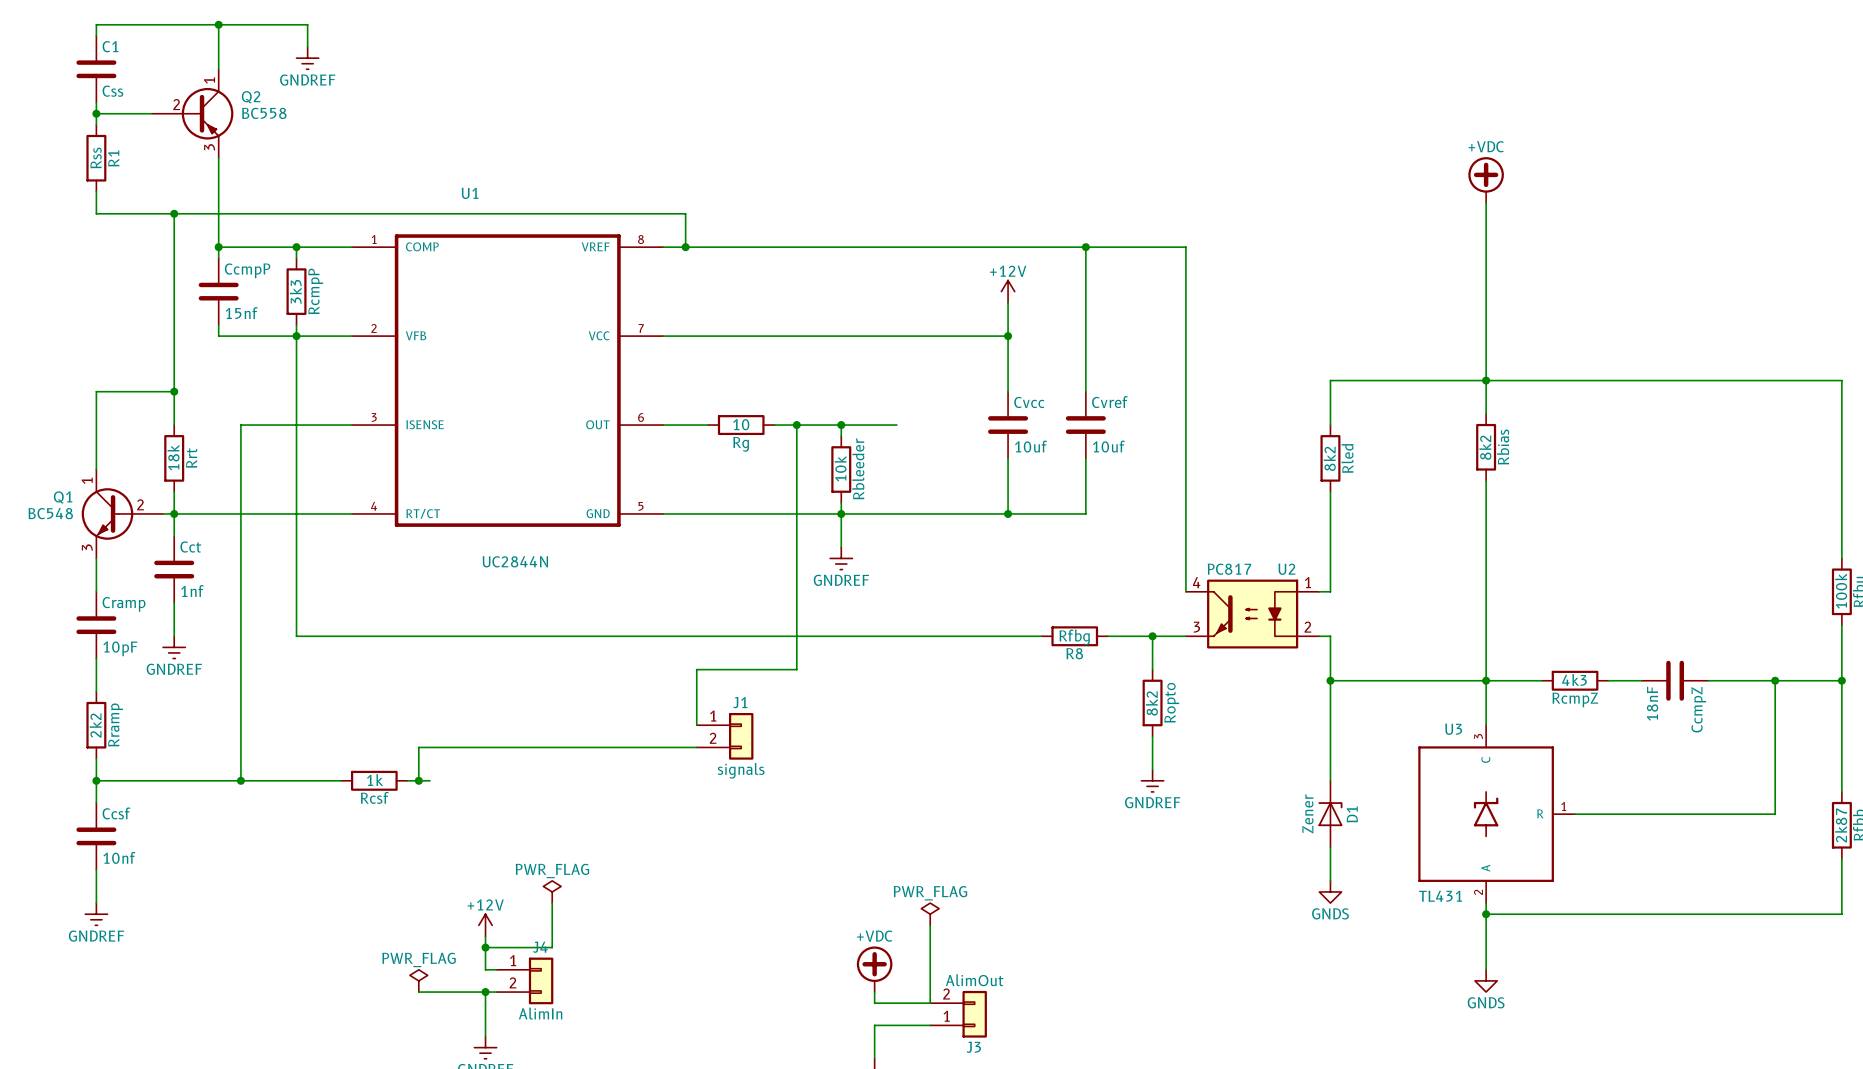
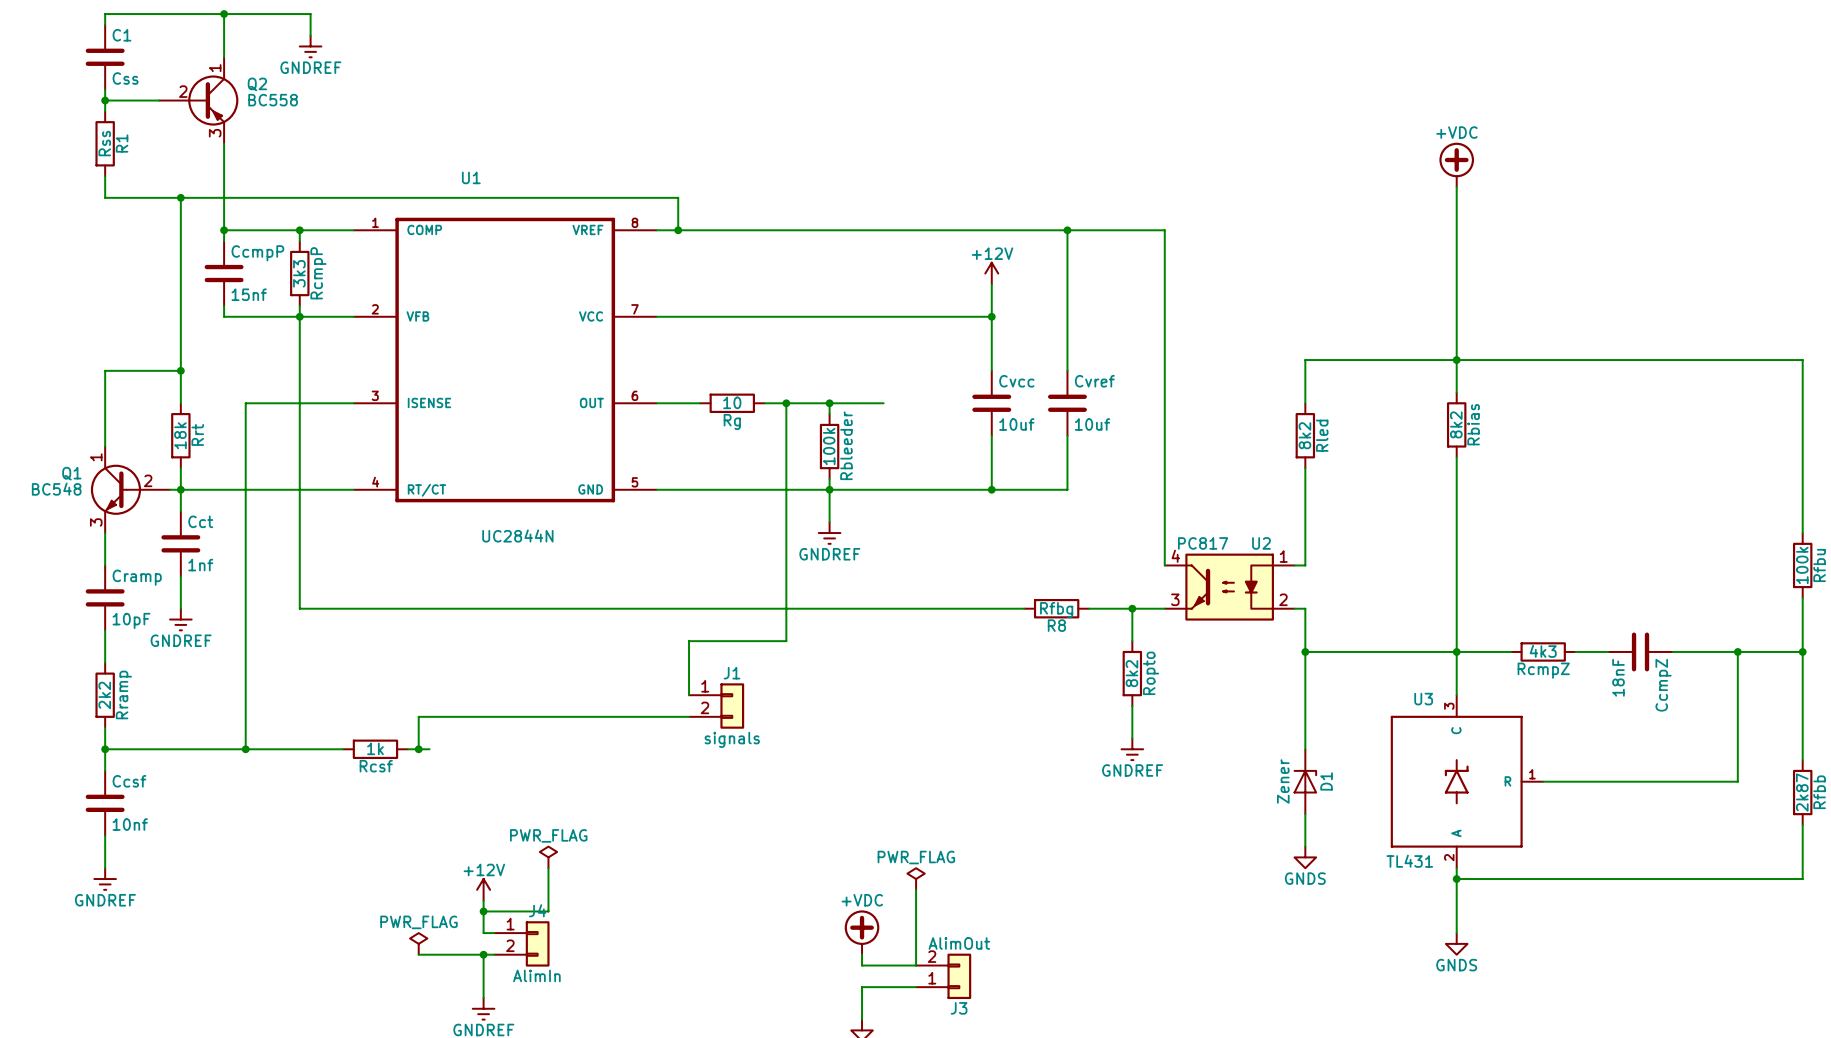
Rbleeder value: 10k (840, 468) -> 100k (829, 446)

